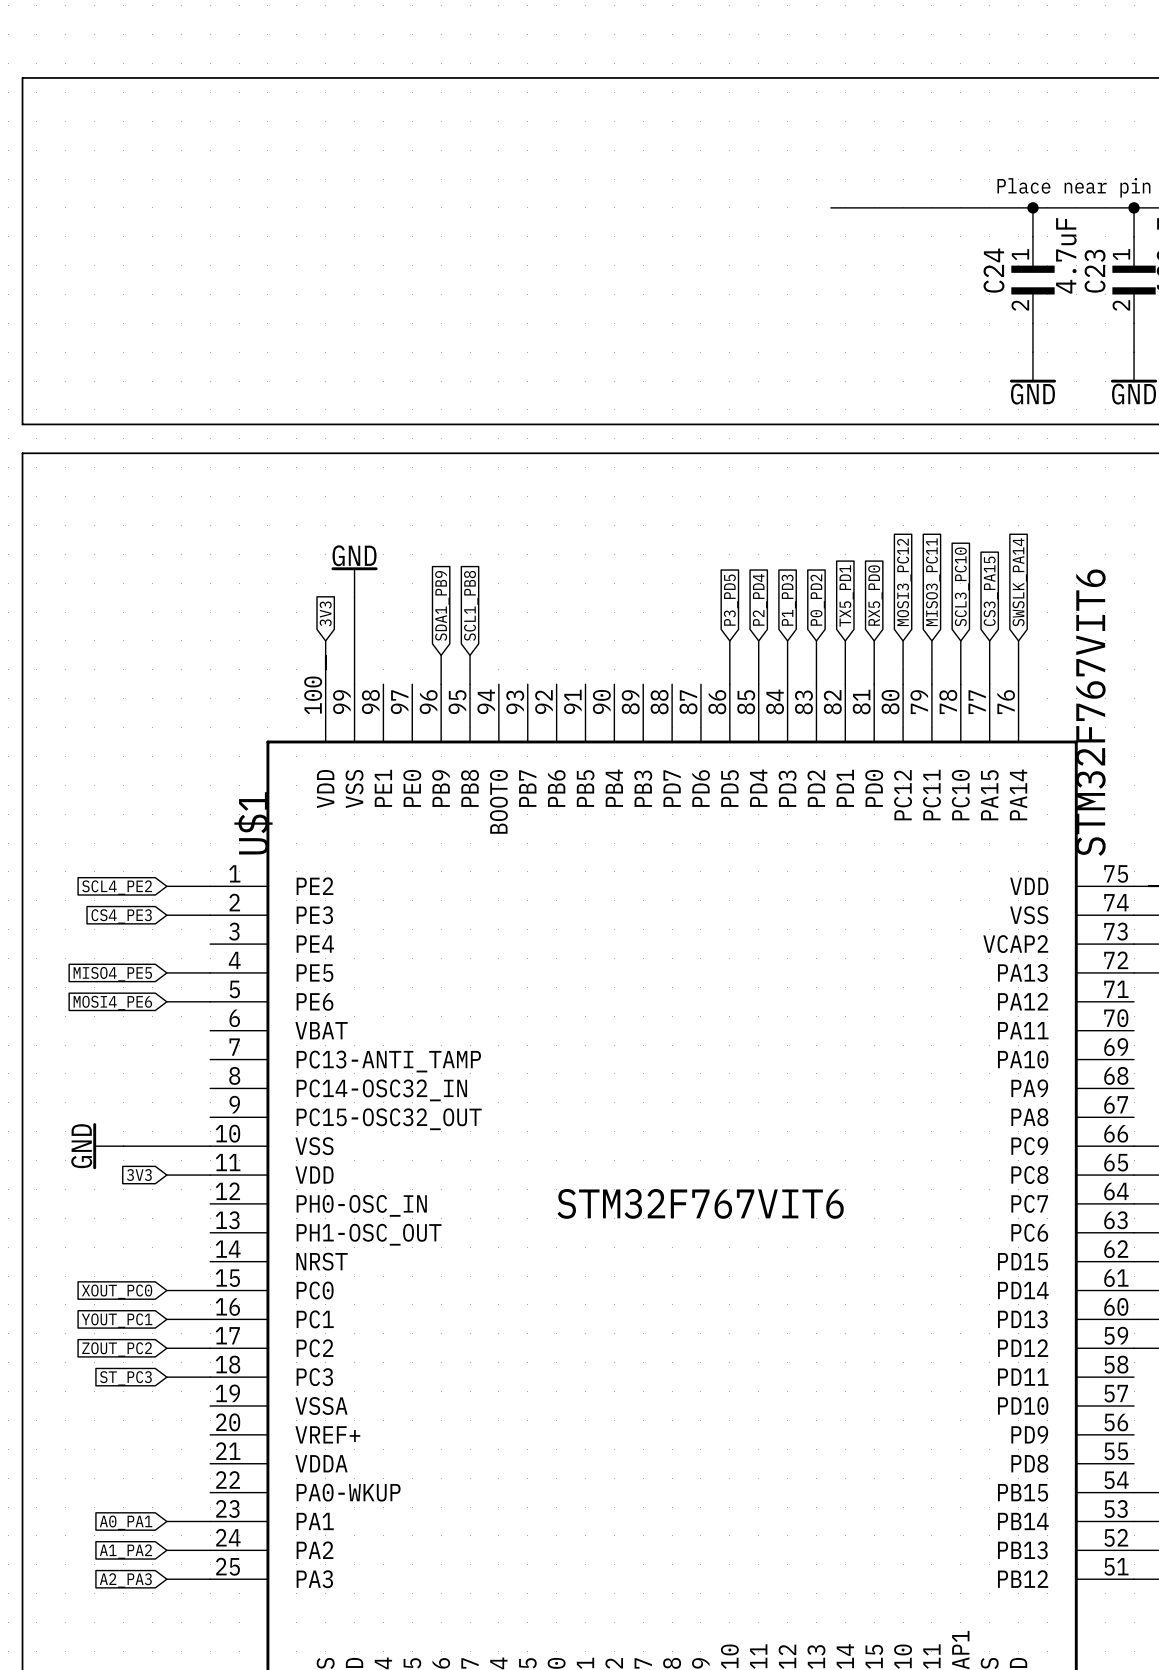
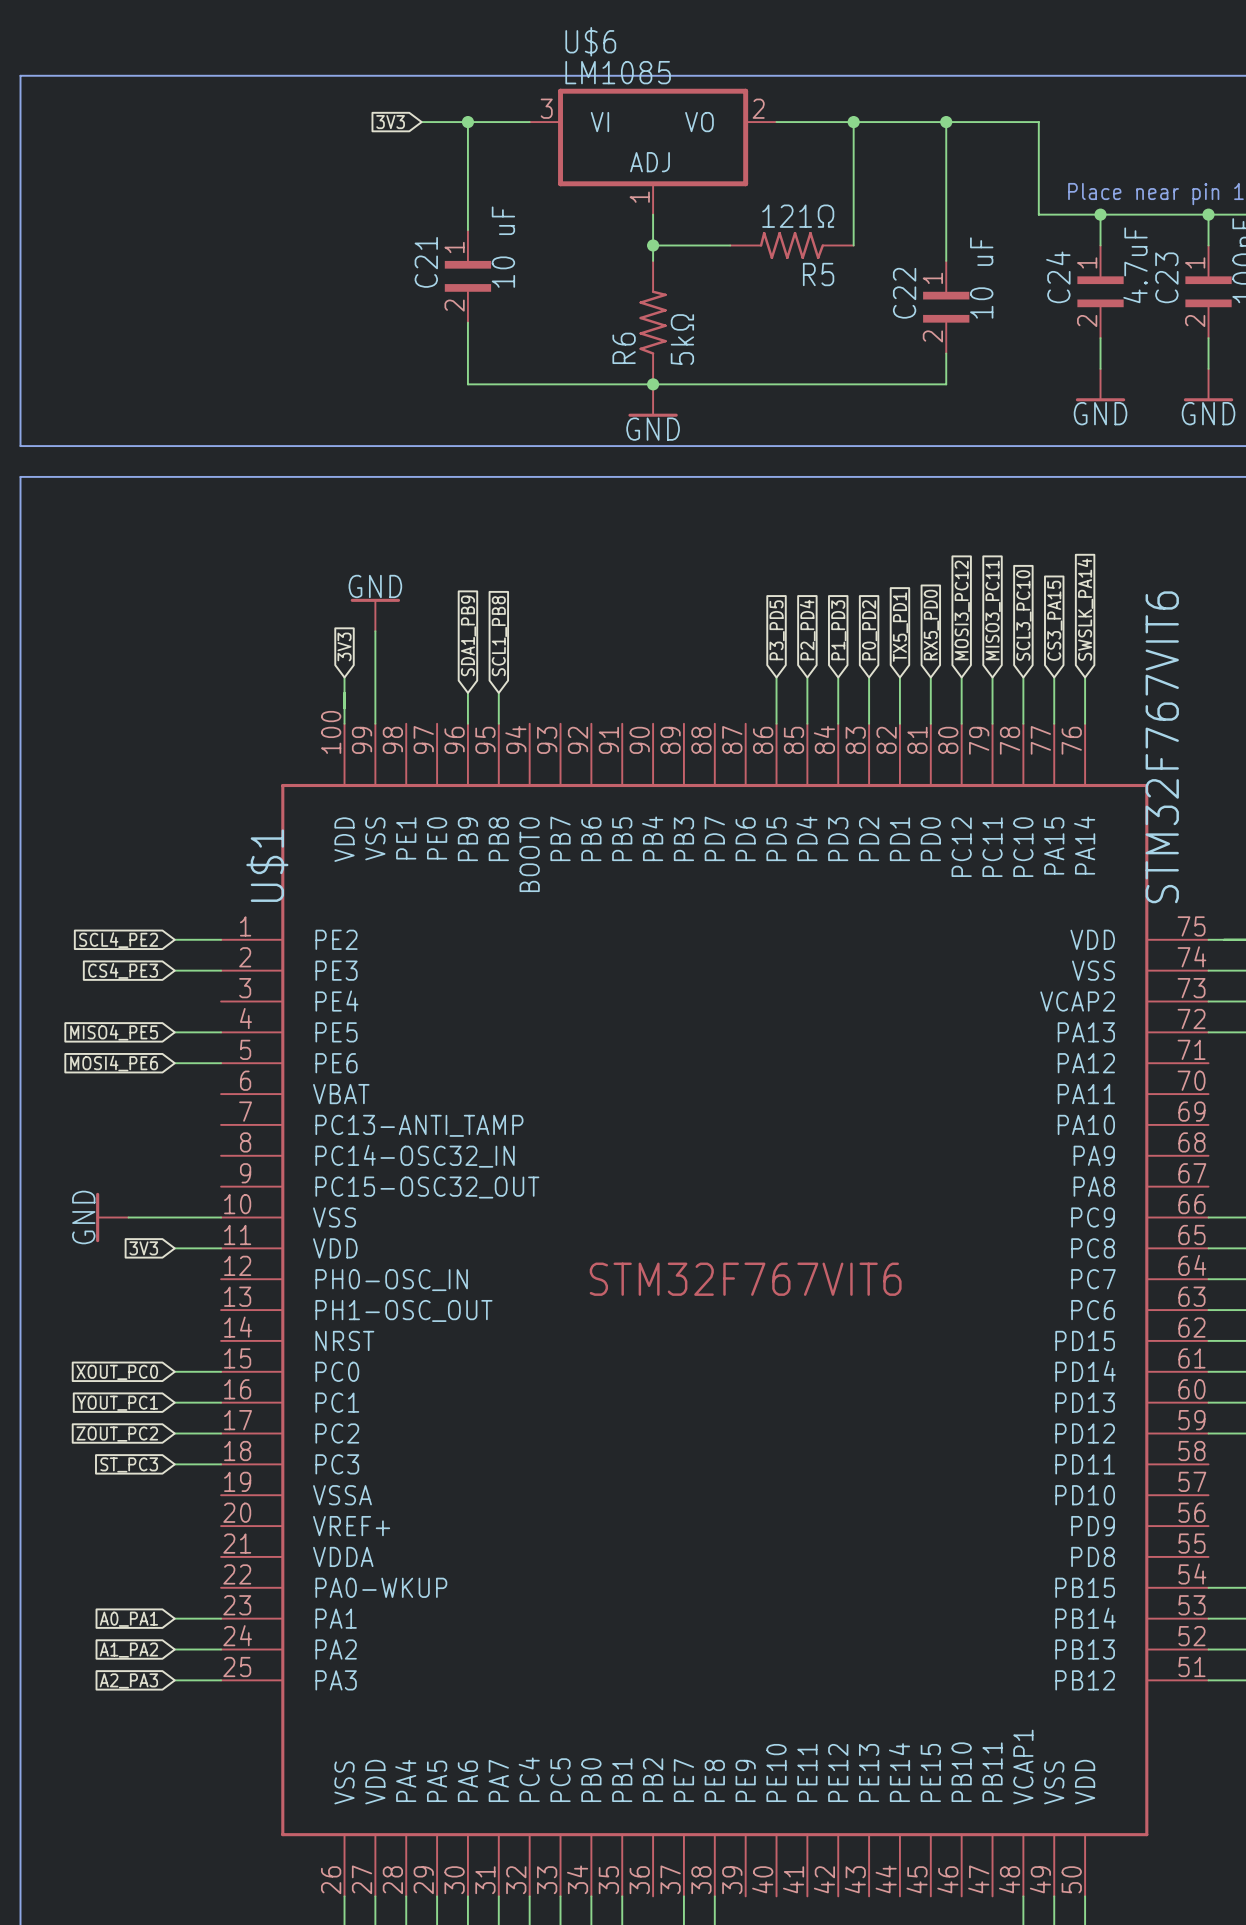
global label: none -> 3V3 (390, 122)
wire: none -> (421, 122) (529, 122)
wire: none -> (467, 122) (467, 230)
junction: none -> (467, 122)
wire: none -> (853, 122) (853, 245)
junction: none -> (853, 122)
wire: none -> (946, 122) (946, 260)
junction: none -> (946, 122)
U$6: none -> LM1085 (653, 151)
wire: none -> (653, 214) (653, 260)
wire: (830, 207) (975, 207) -> (776, 122) (1038, 122) (1038, 214)
wire: none -> (653, 245) (730, 245)
junction: none -> (653, 245)
R5: none -> 121Ω (791, 245)
C21: none -> 10 uF (467, 276)
C22: none -> 10 uF (946, 307)
wire: none -> (467, 322) (467, 384) (946, 384) (946, 353)
R6: none -> 5kΩ (653, 322)
junction: none -> (653, 384)
power symbol: none -> GND (653, 400)

